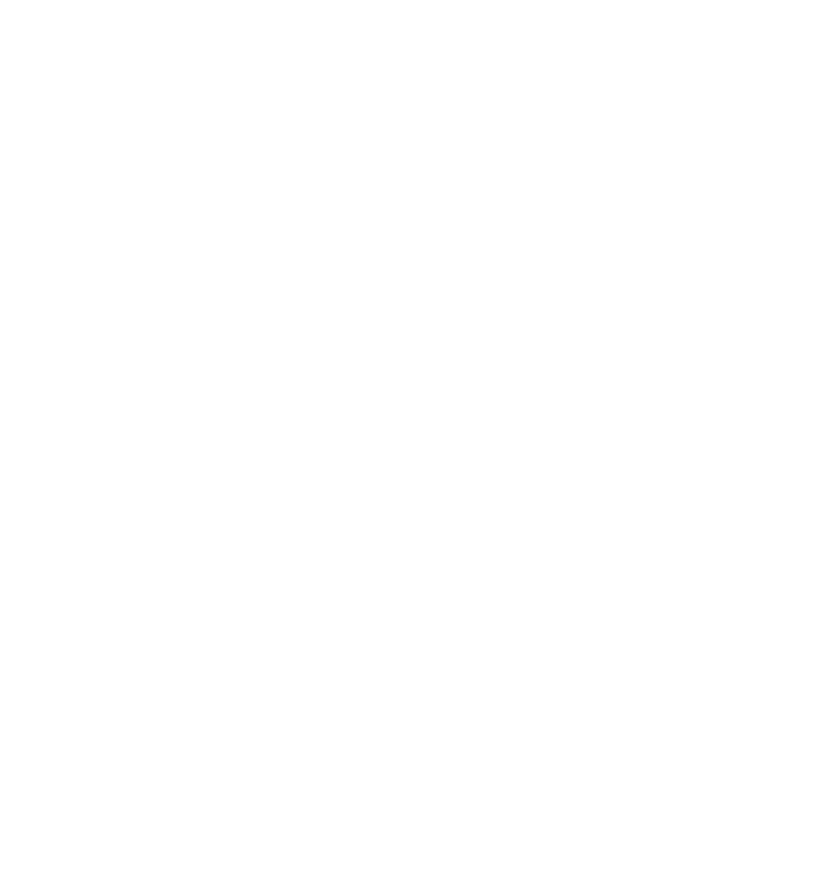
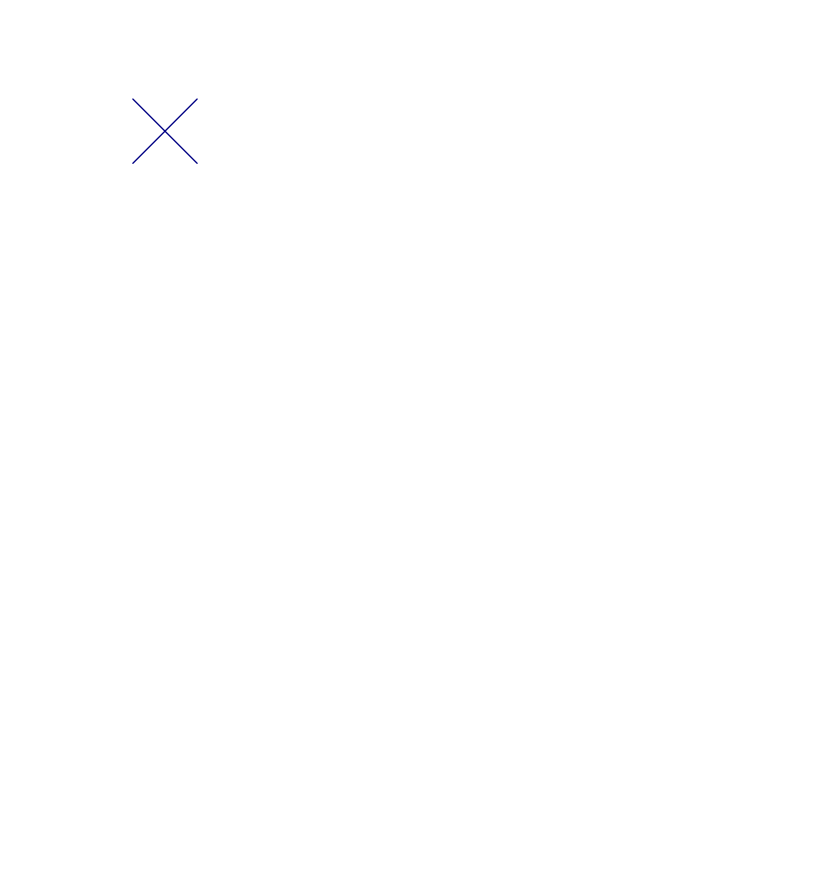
no-connect mark: none -> (164, 131)

